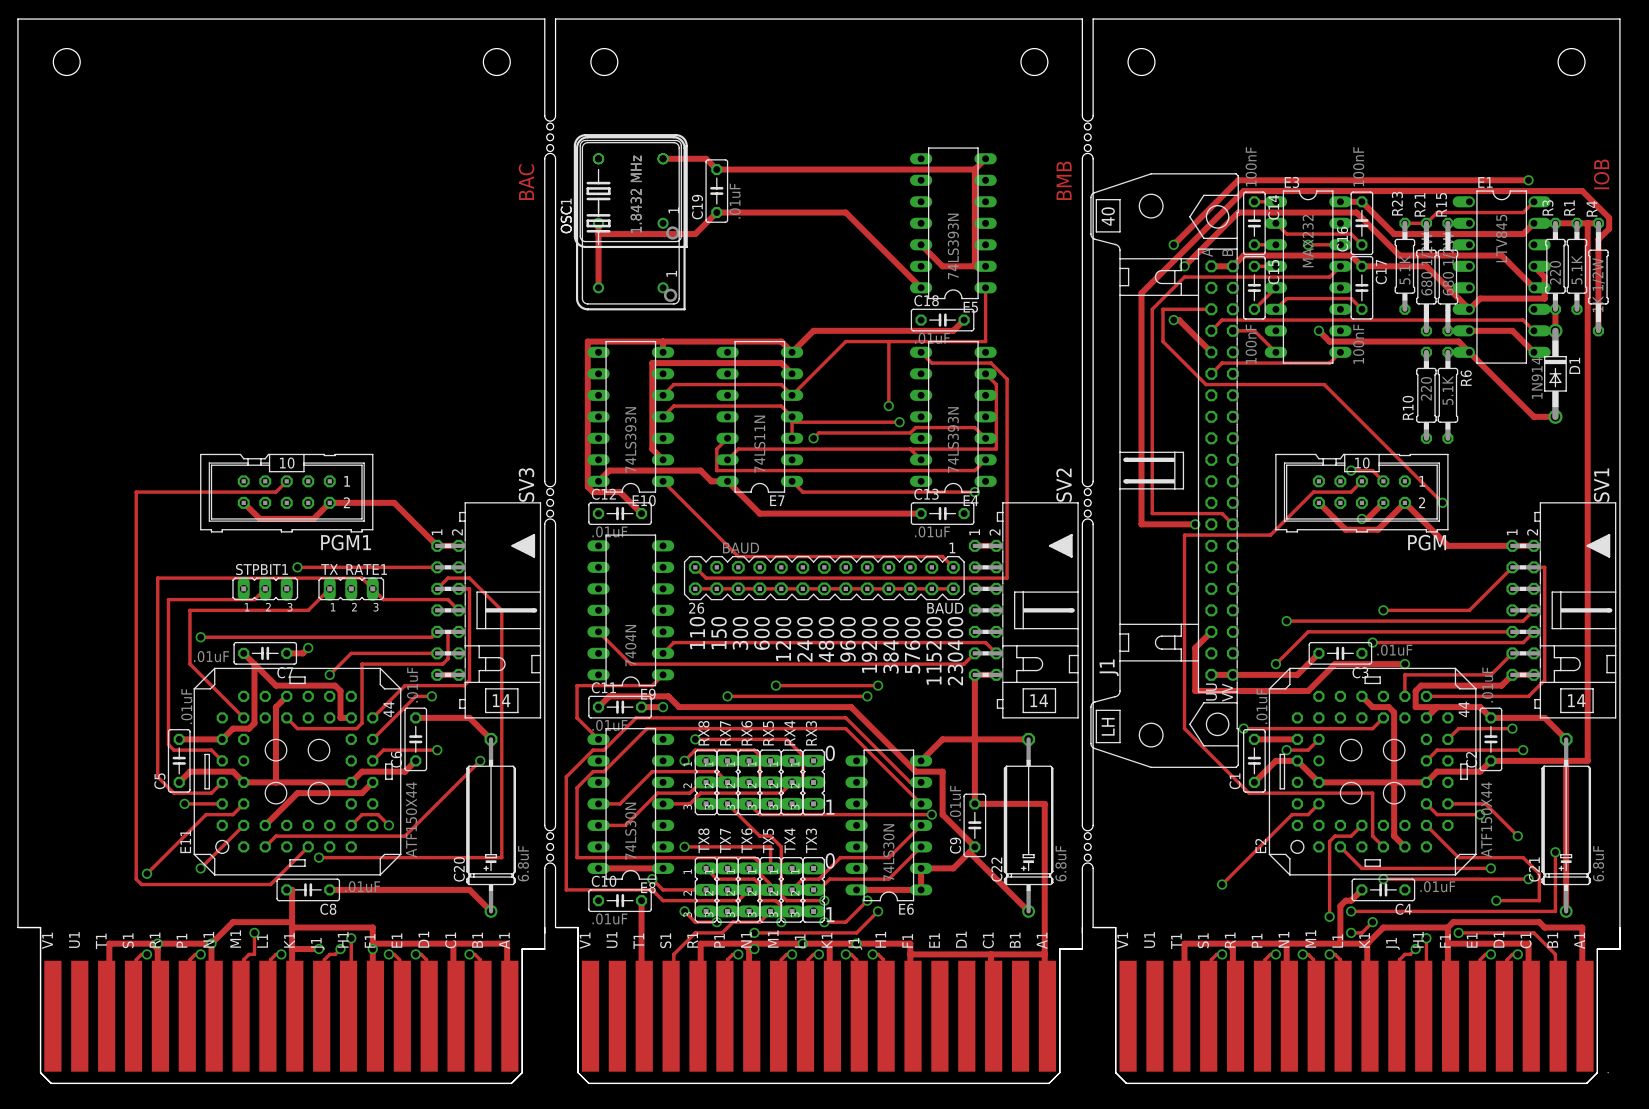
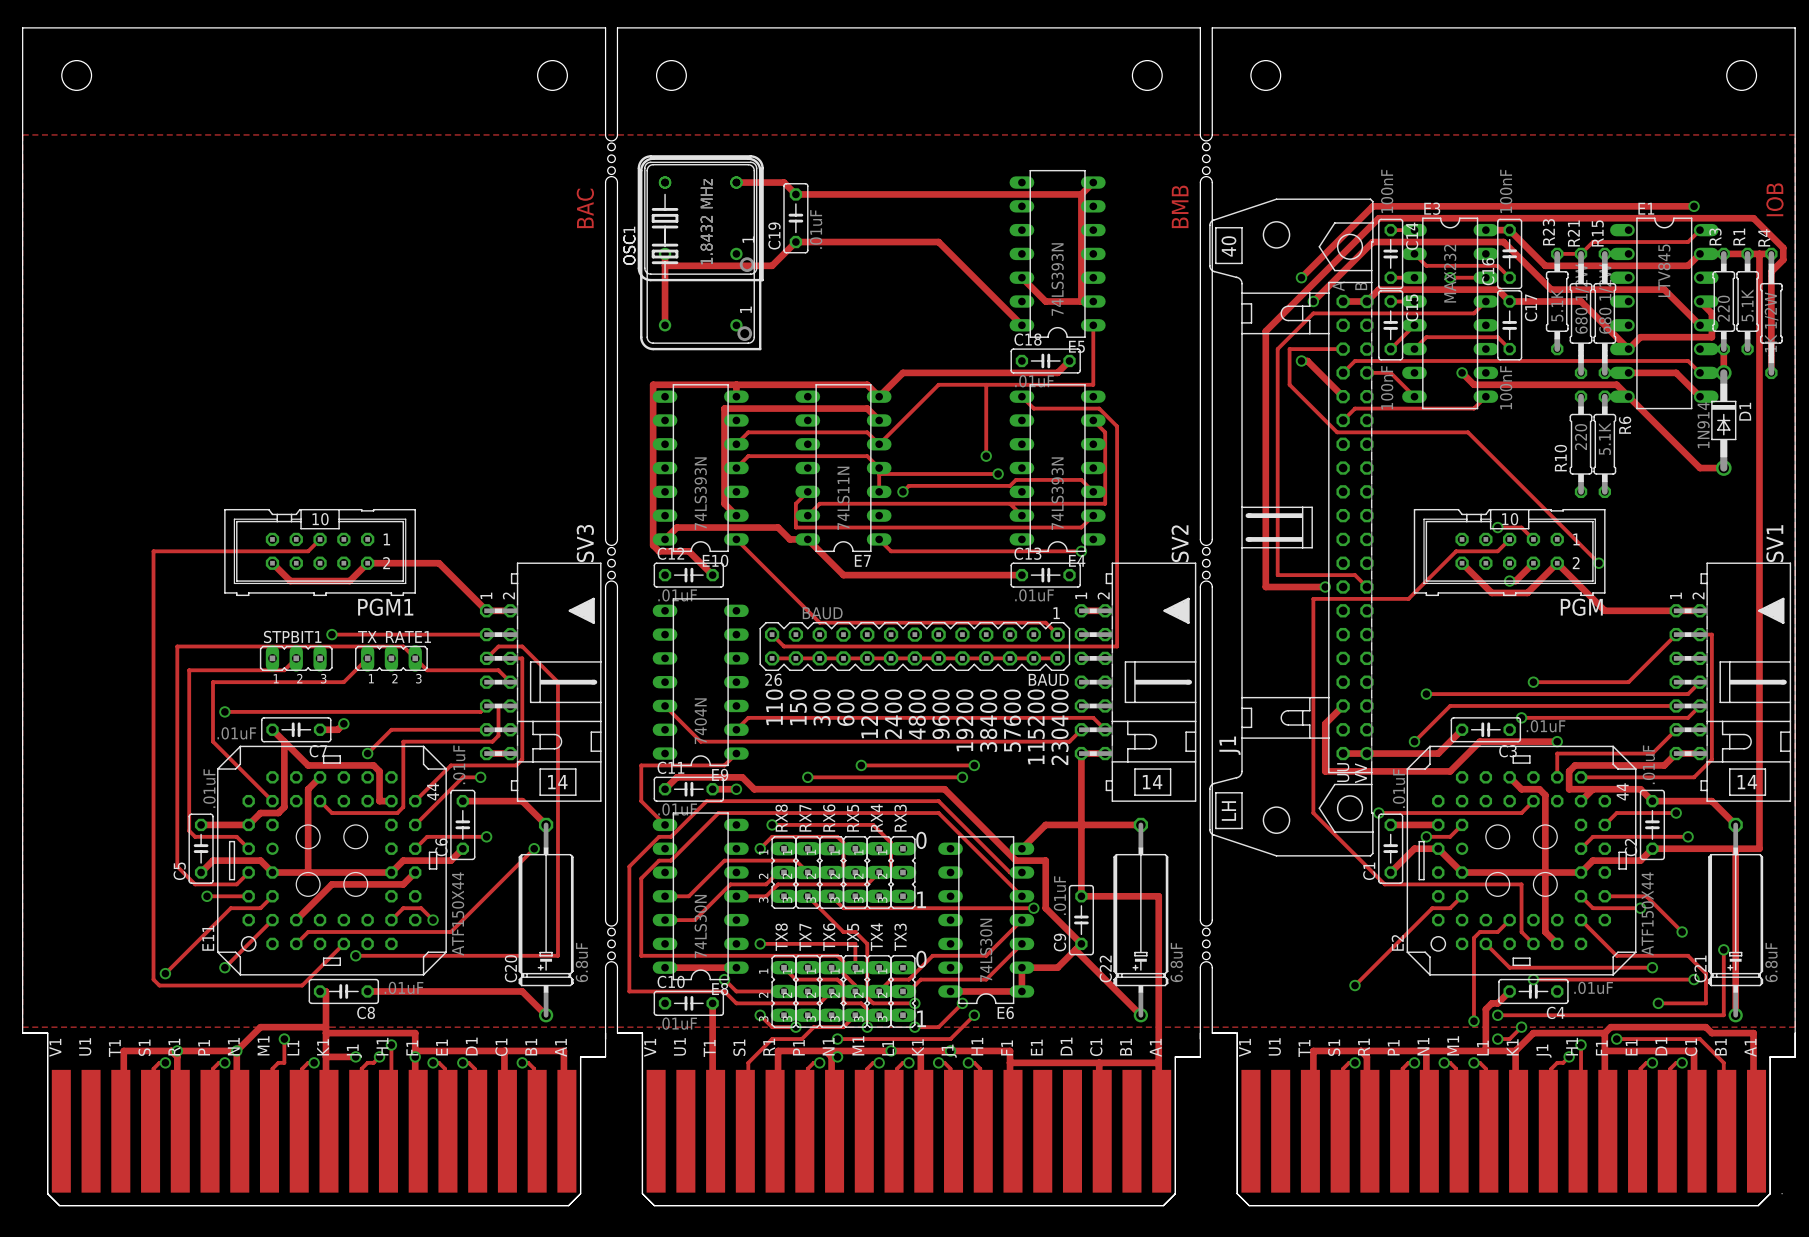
zone outline: none -> (22, 134) (1795, 134) (1795, 1027) (22, 1027) (22, 134)

